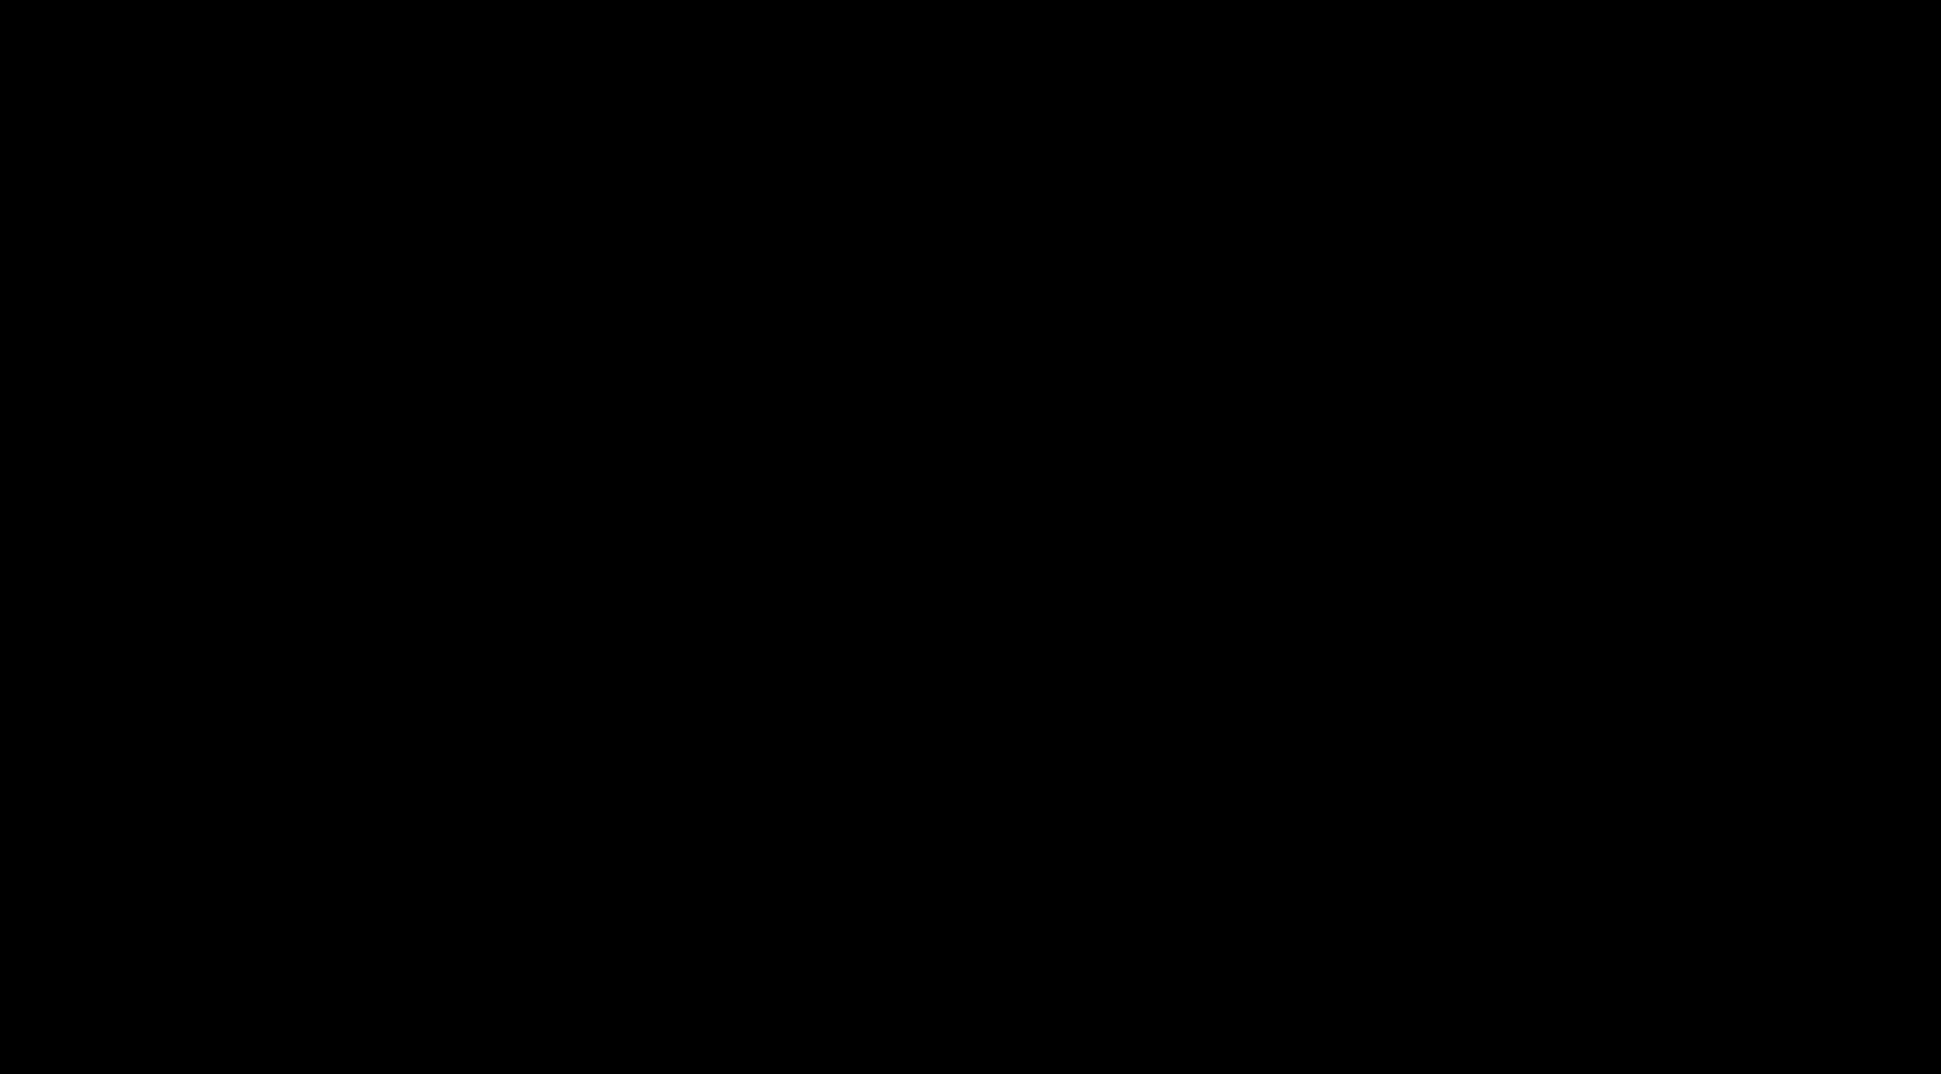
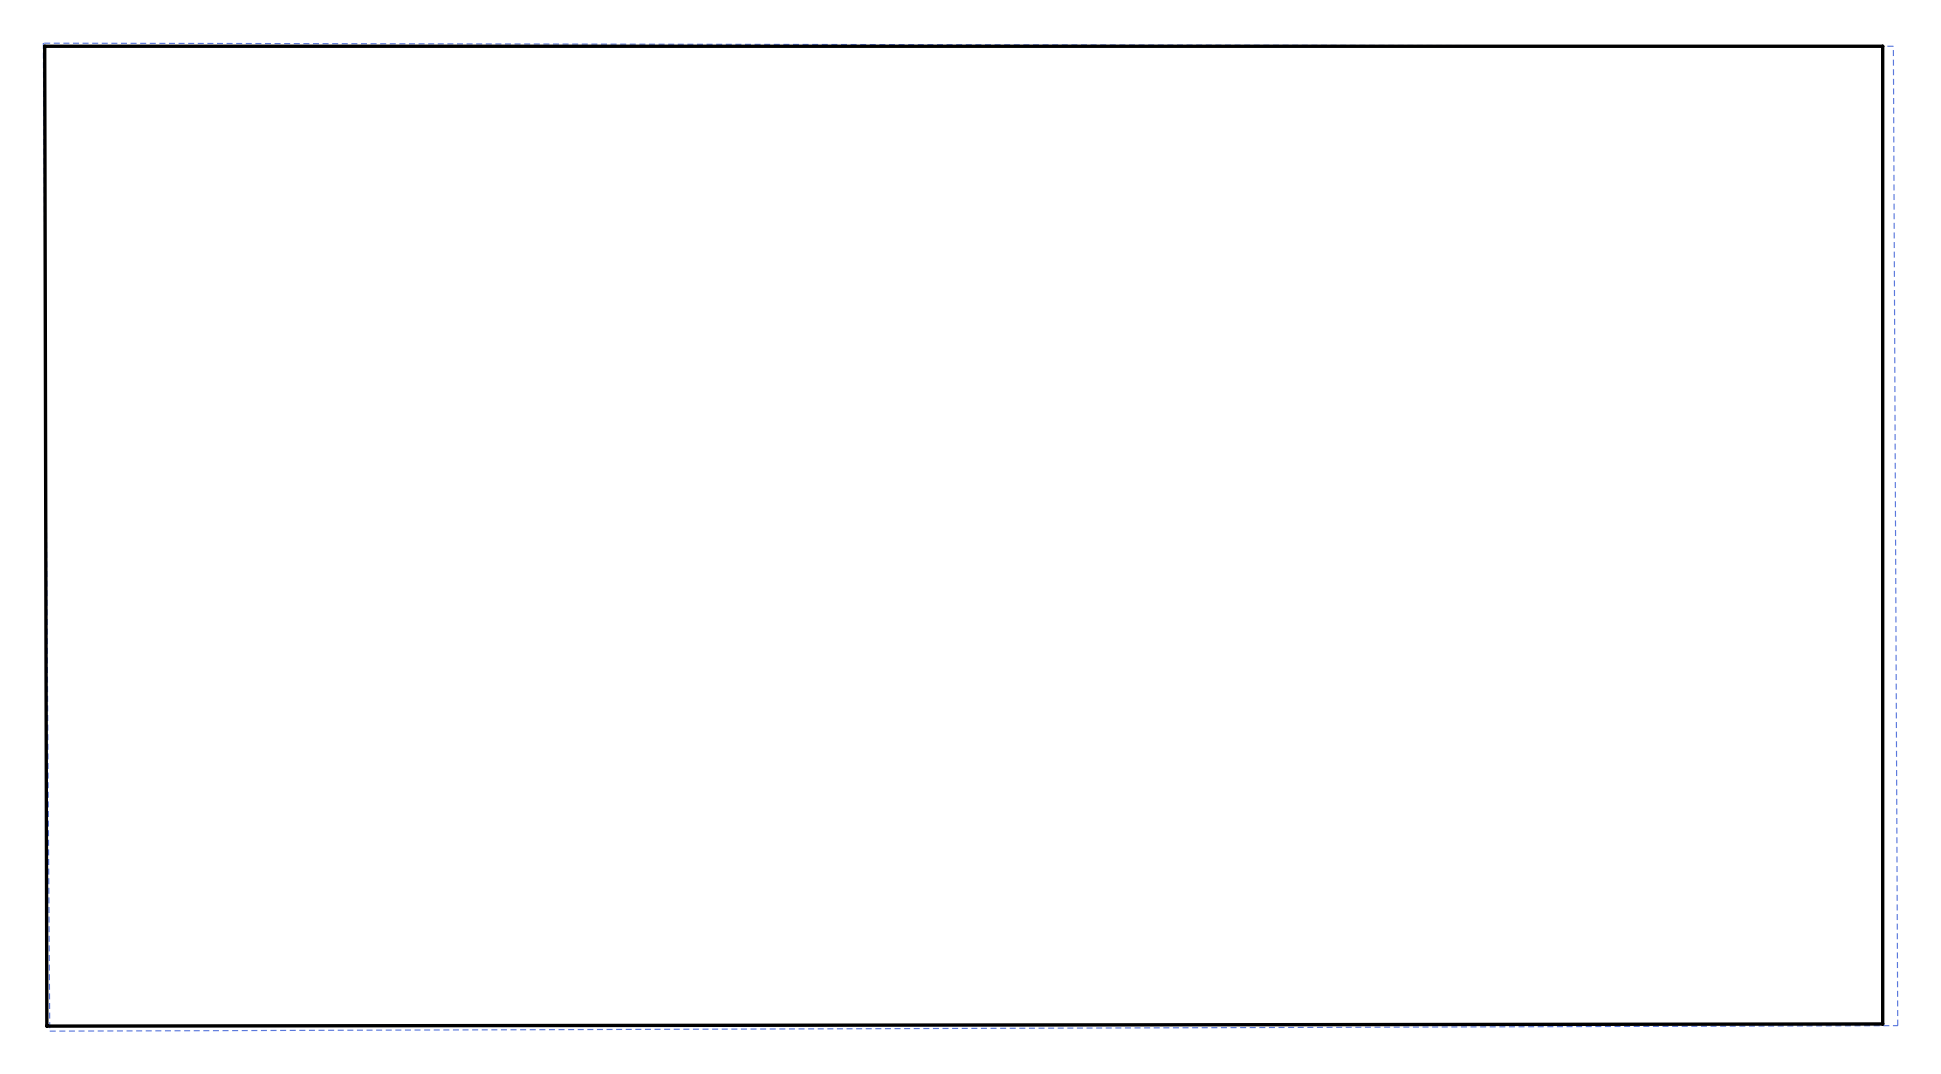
bottom zone outline: none -> (43, 43) (49, 1031) (1897, 1025) (1893, 46) (43, 43)
board edge: none -> (44, 46) (46, 1026) (1882, 1023) (1882, 46) (44, 46)

